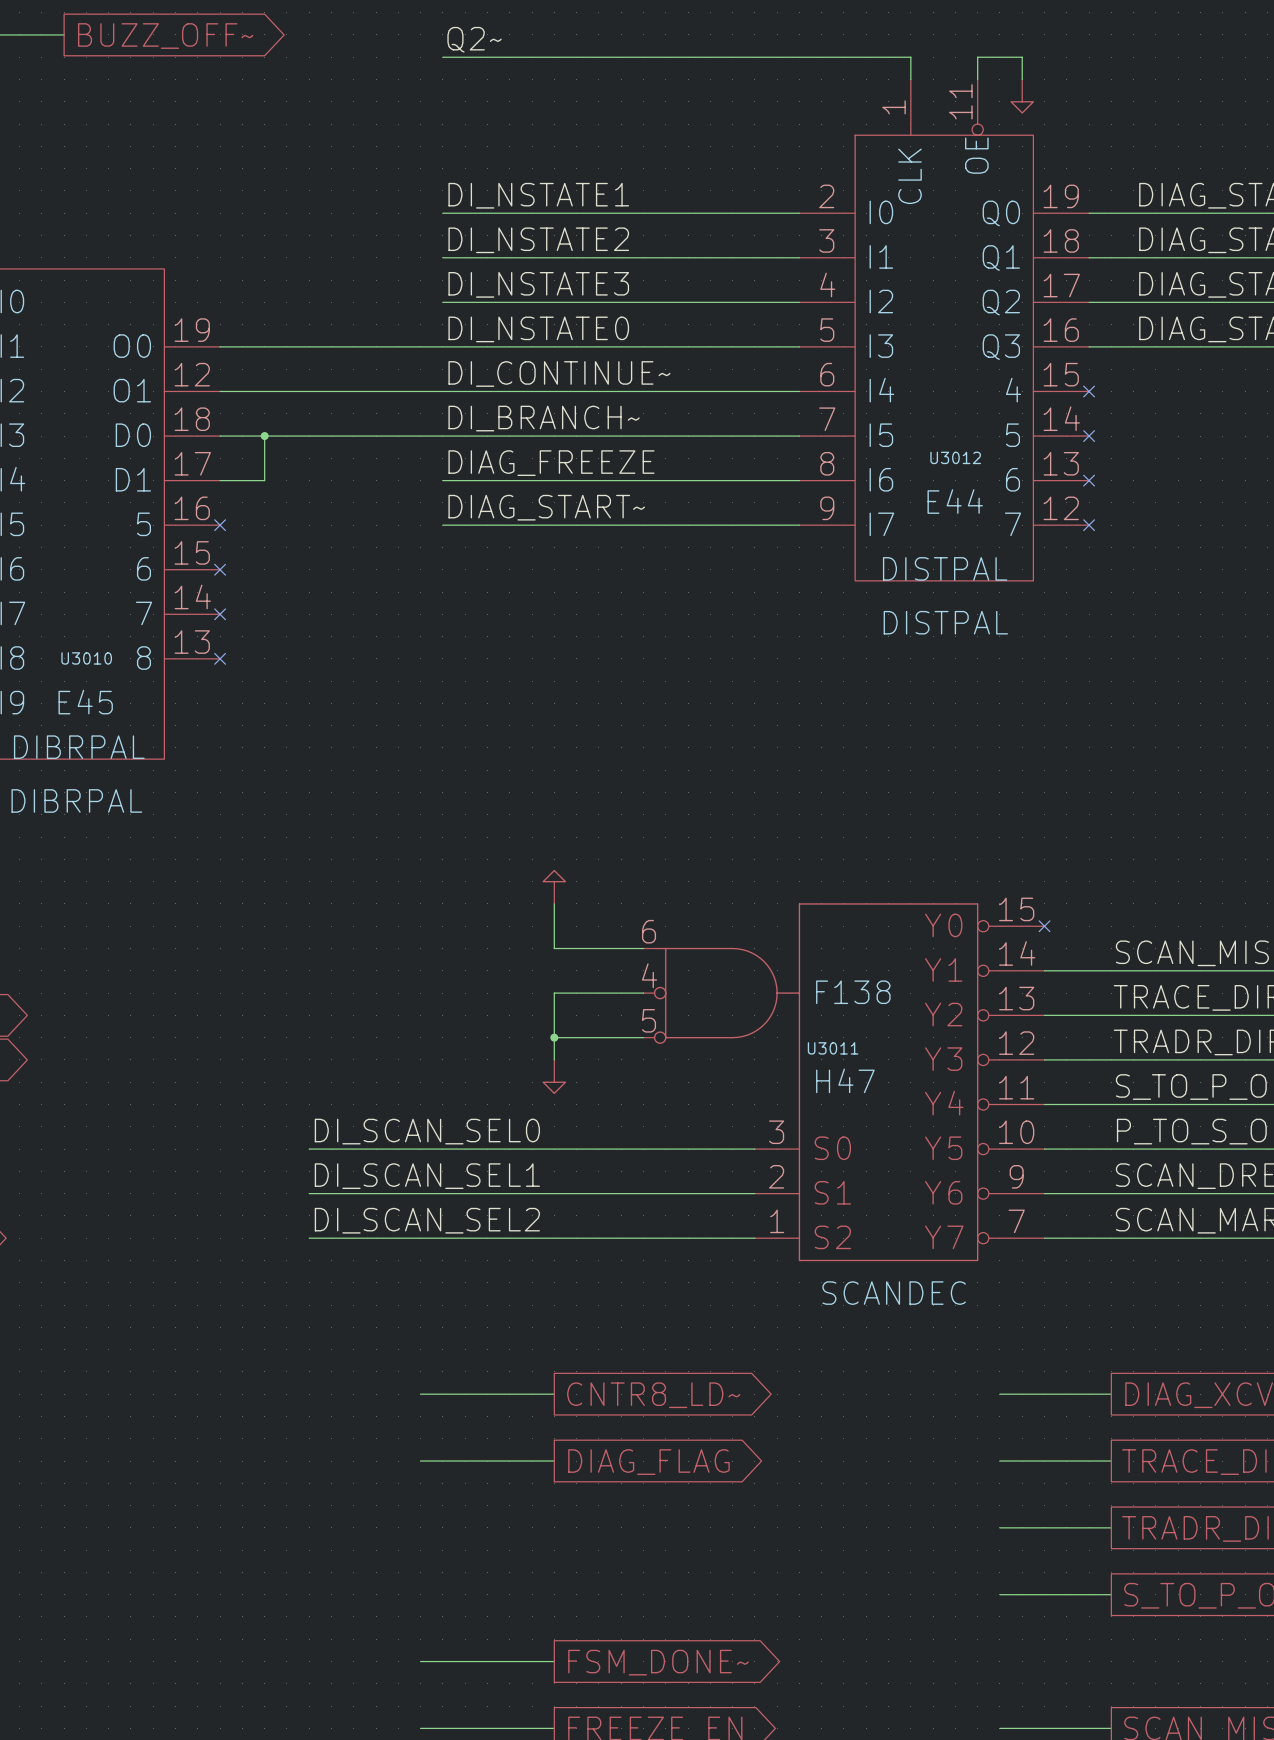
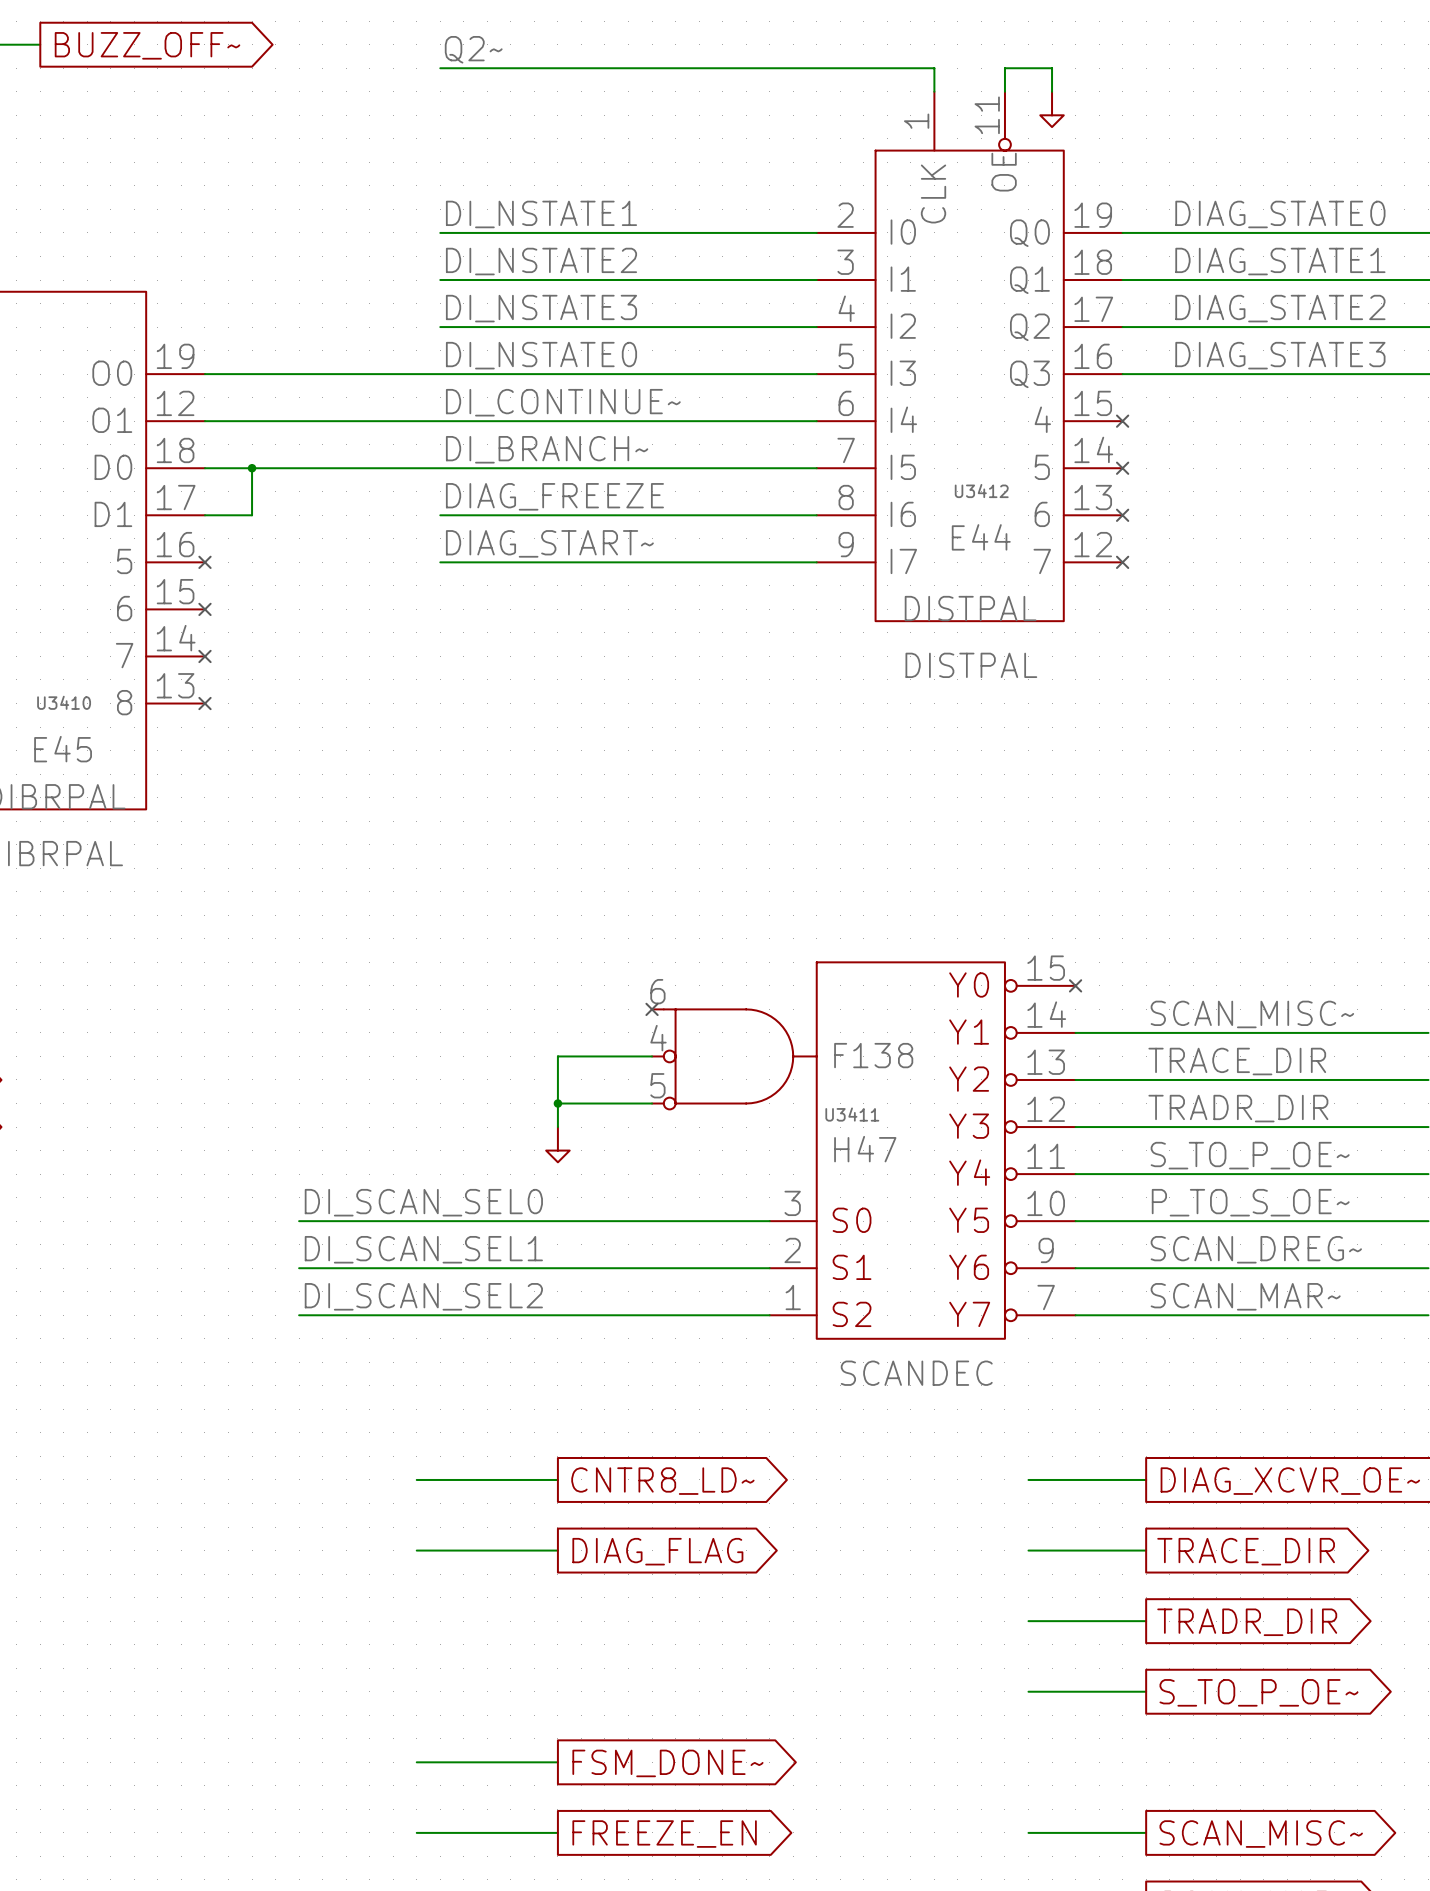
U3012 name: U3012 (955, 457) -> U3412 (981, 491)
U3010 name: U3010 (86, 658) -> U3410 (64, 702)
power symbol: (554, 886) -> none
wire: (554, 903) (554, 948) (643, 948) -> none
no-connect mark: none -> (652, 1009)
U3011 name: U3011 (833, 1048) -> U3411 (852, 1114)

